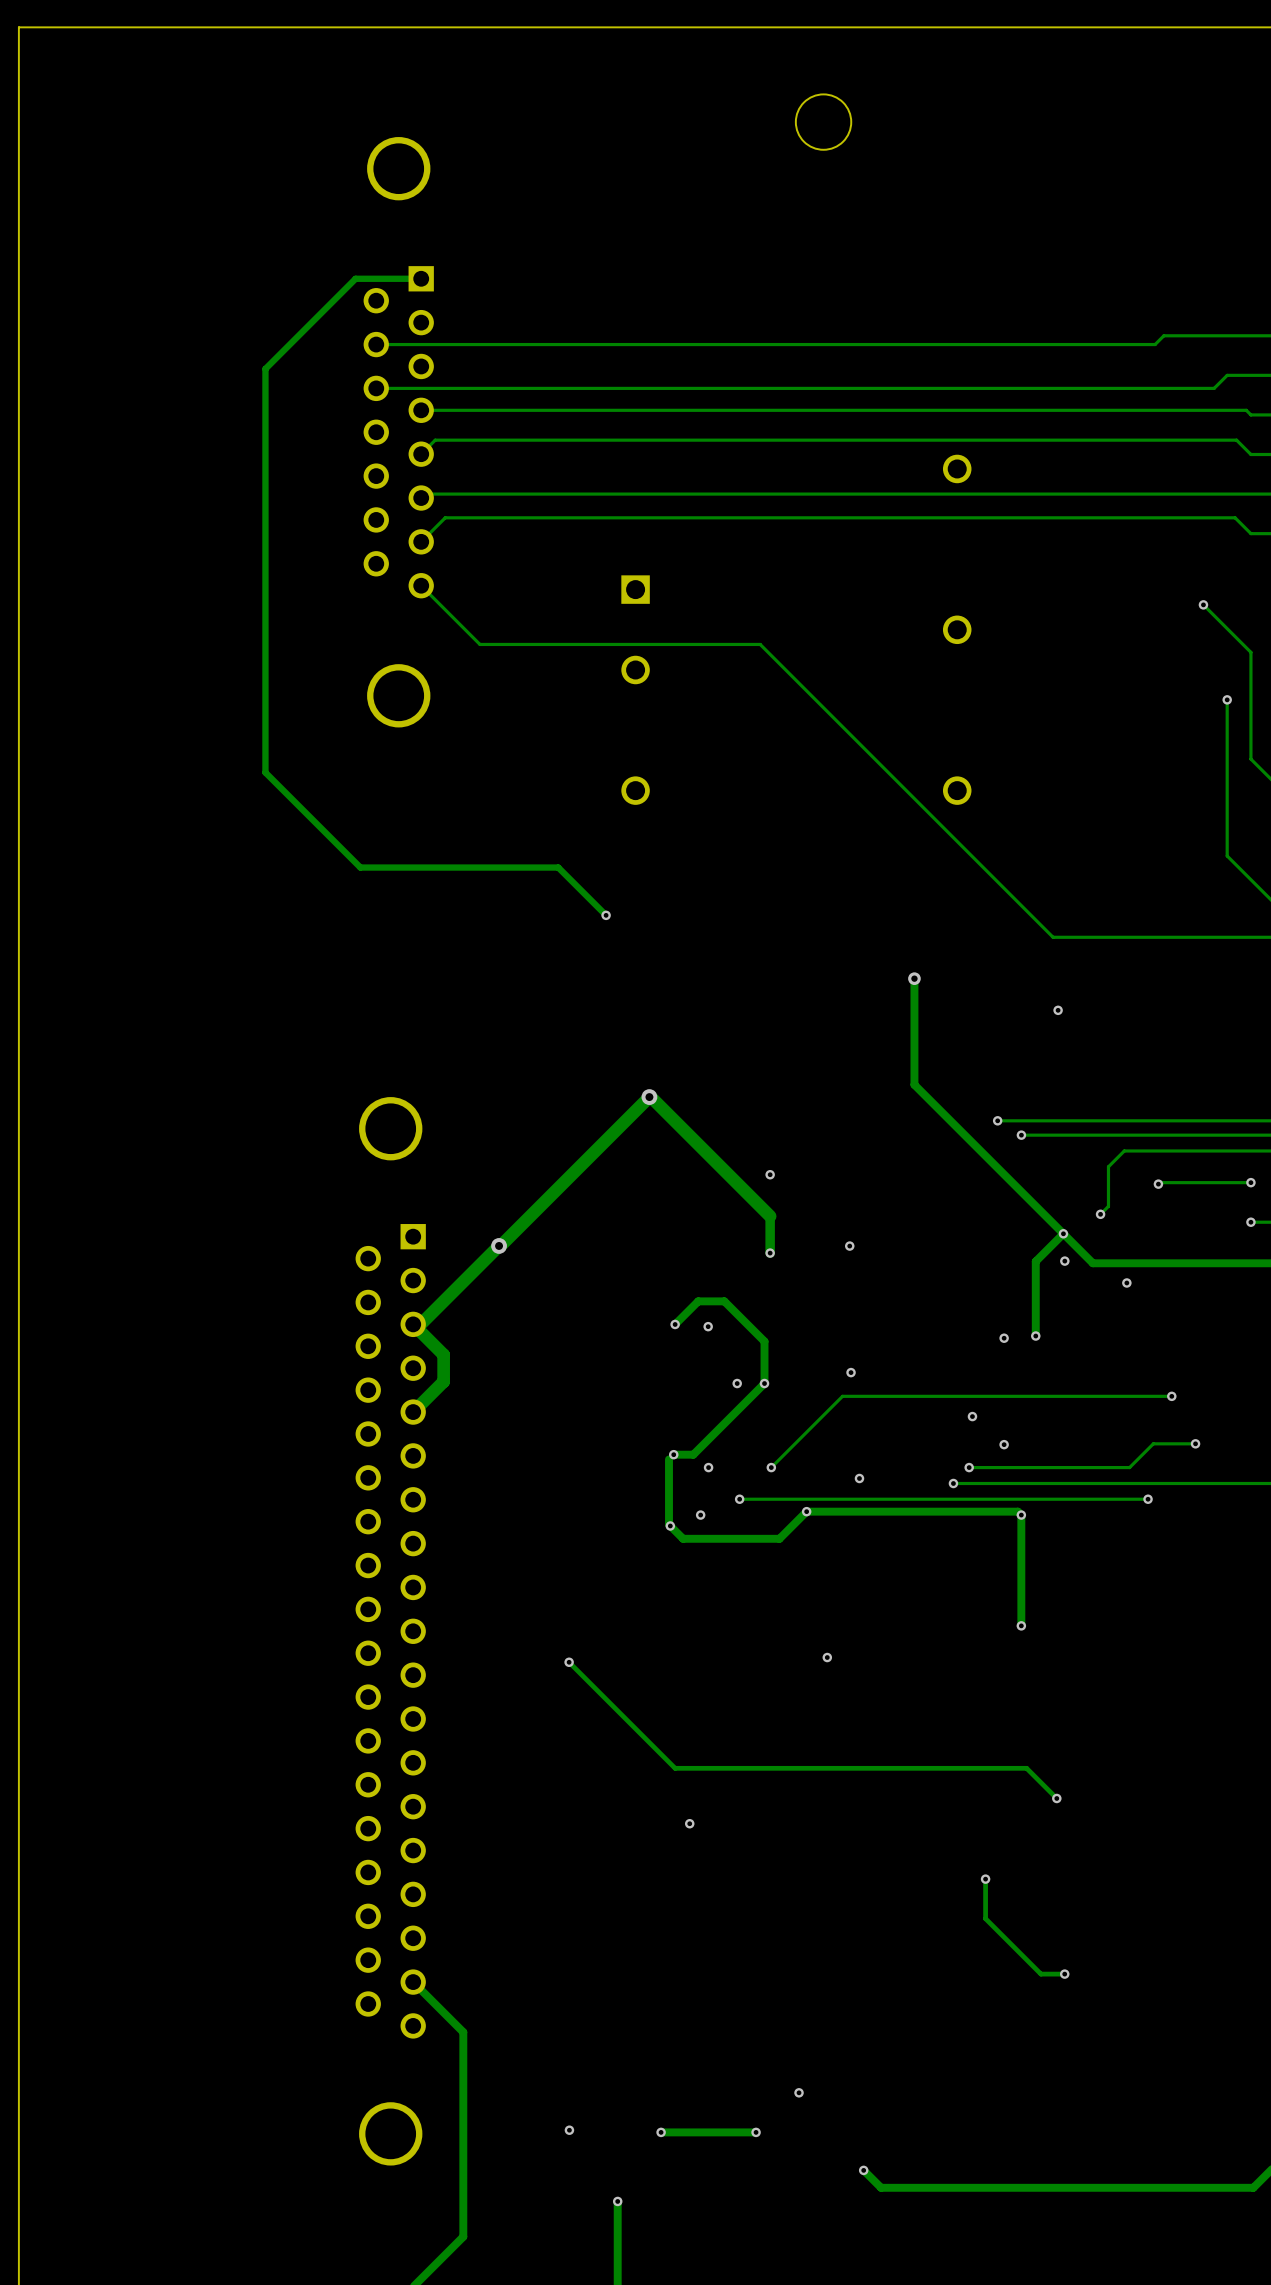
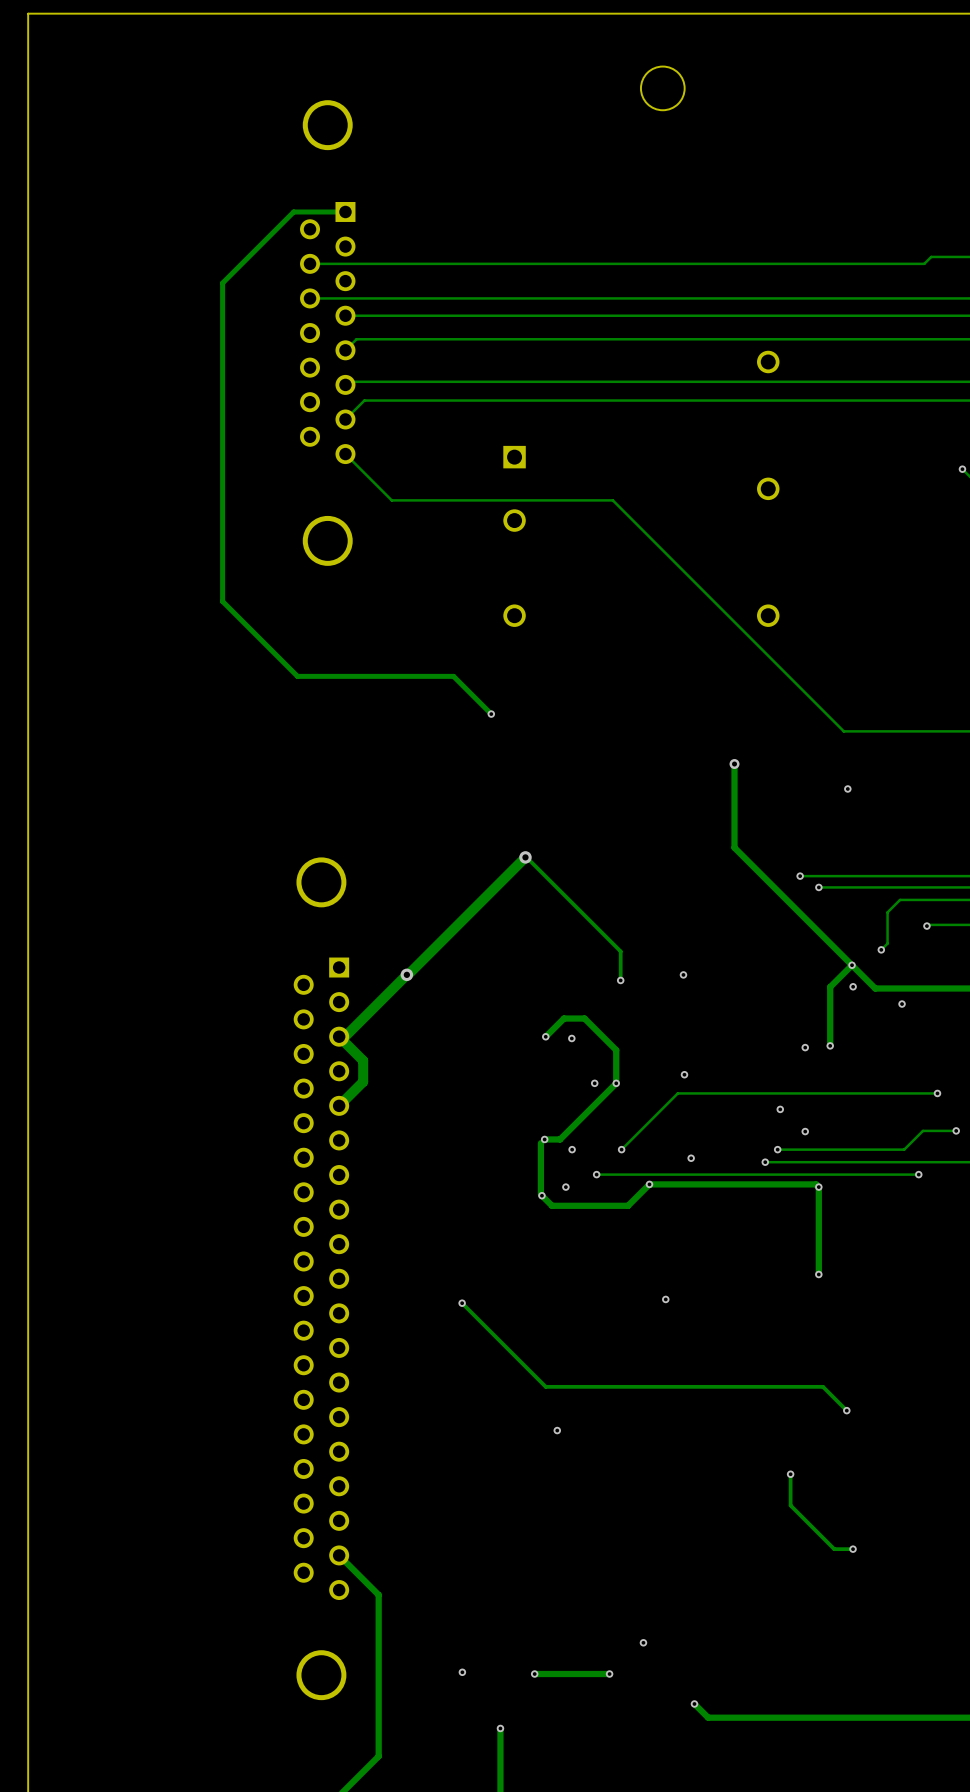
track width: thick (650, 1097) (770, 1216) (770, 1253) -> thin (526, 857) (620, 951) (620, 980)
via: (770, 1174) -> none

